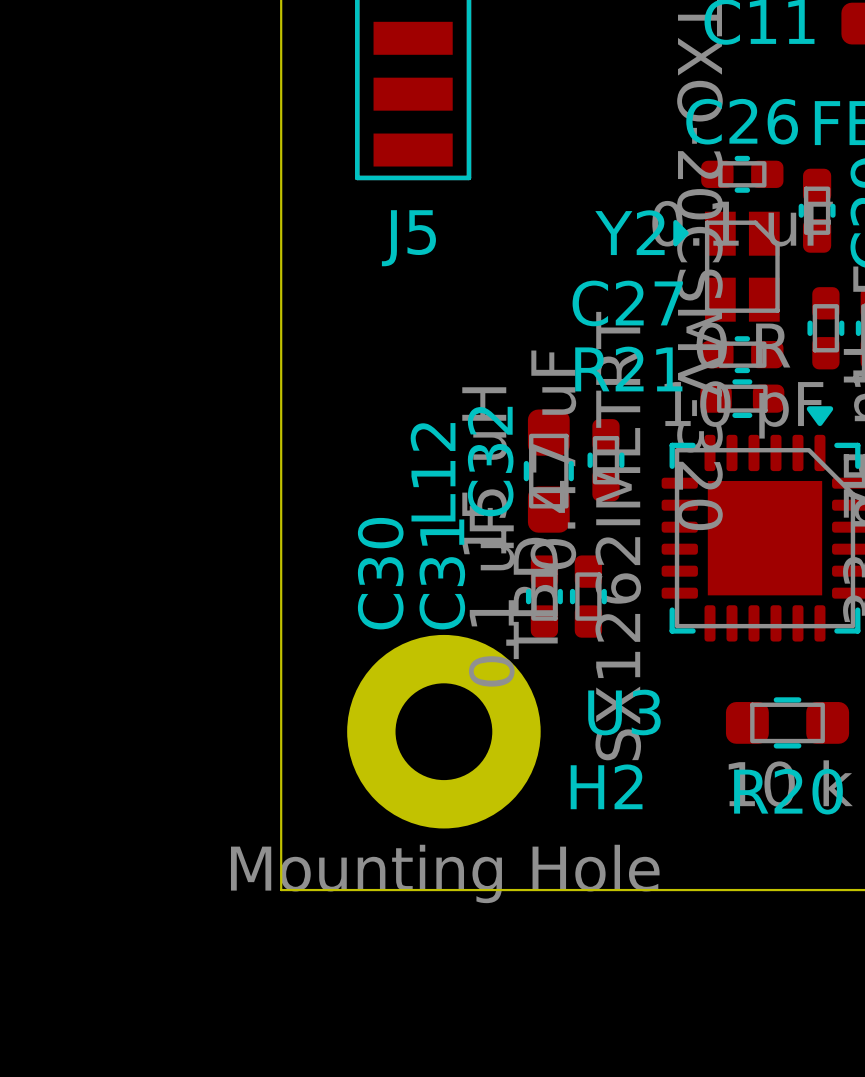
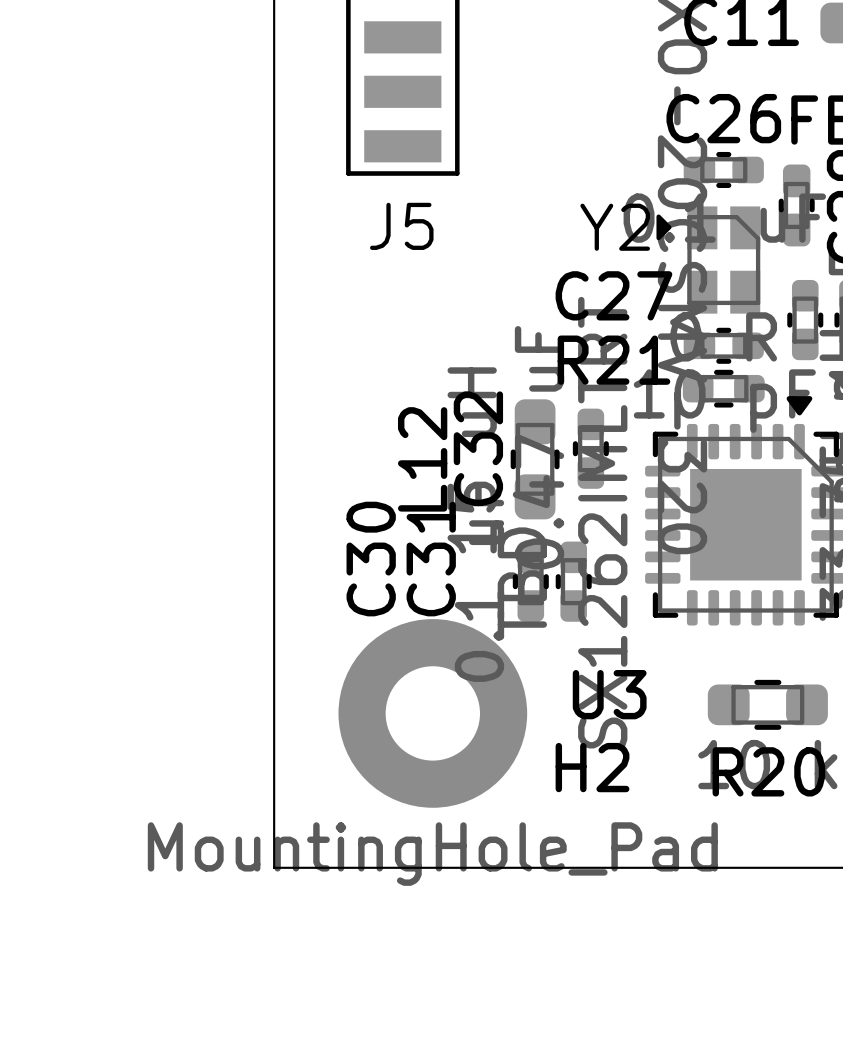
H2 value: Mounting Hole (445, 873) -> MountingHole_Pad (432, 854)

